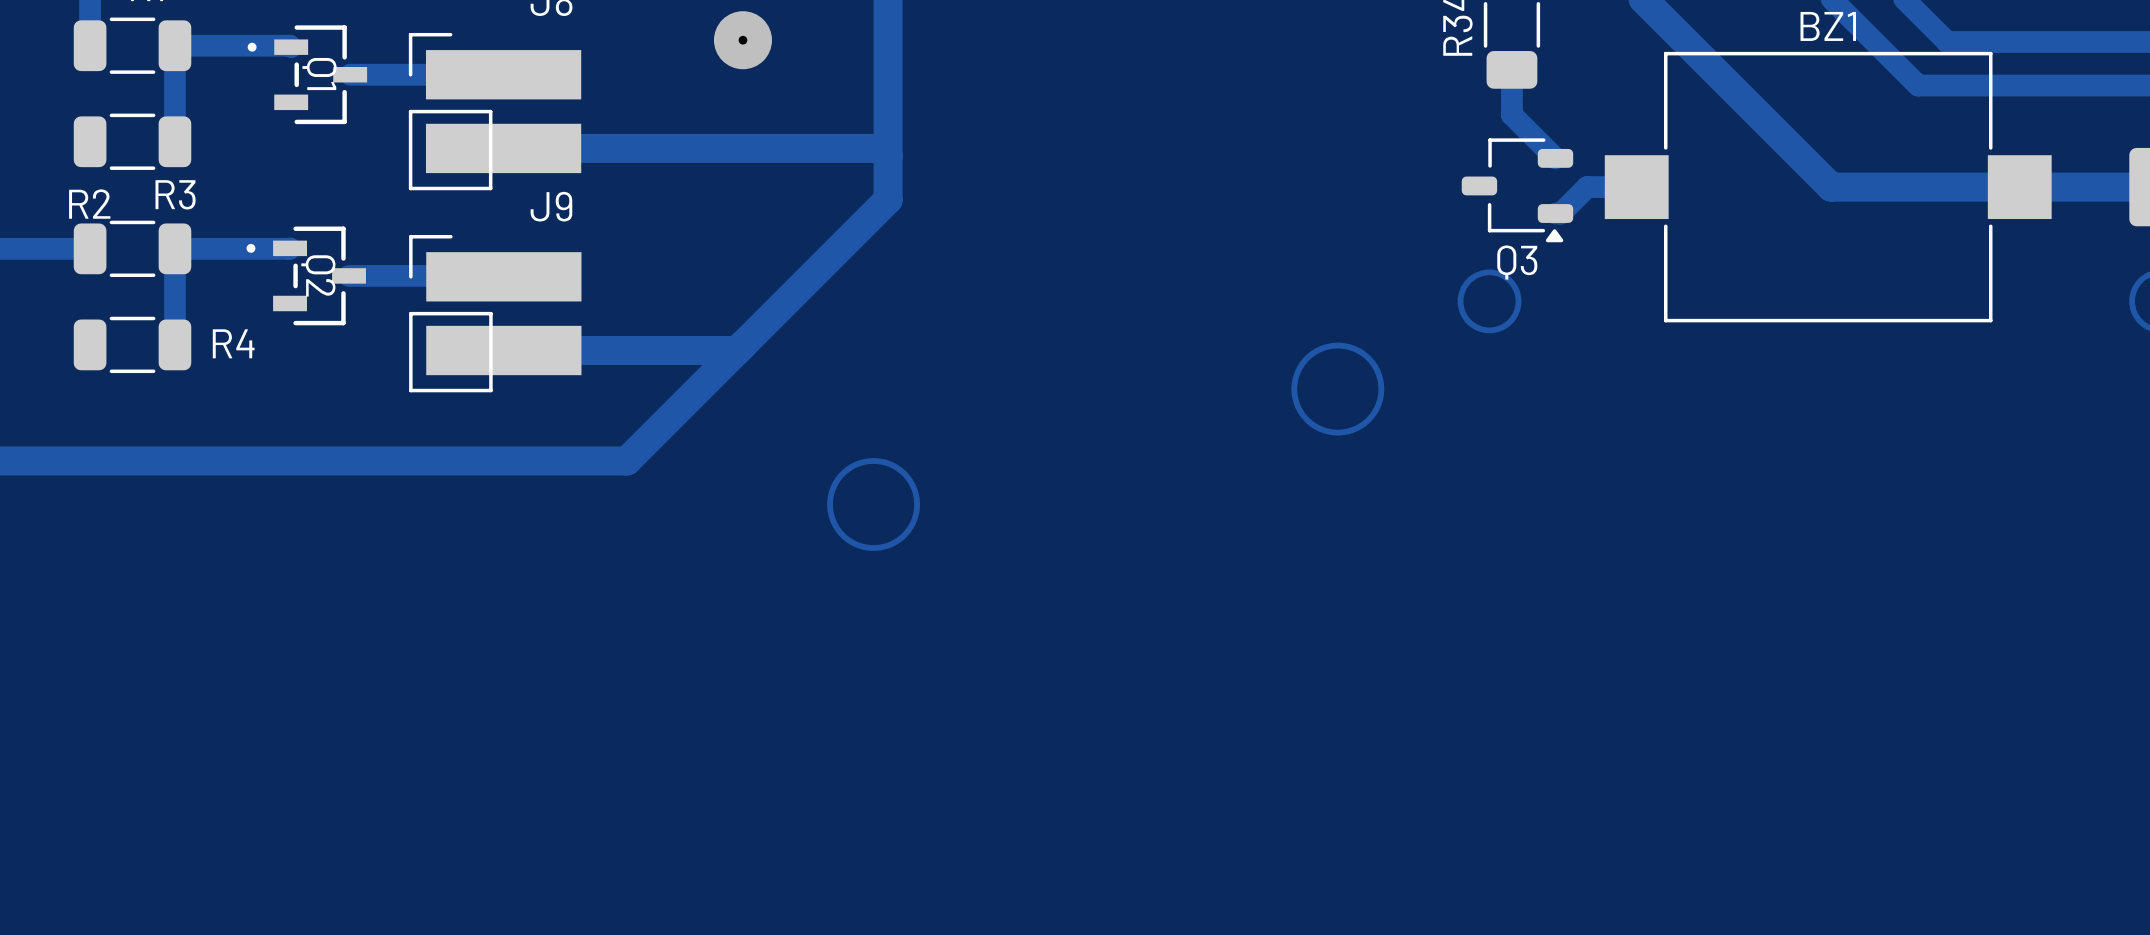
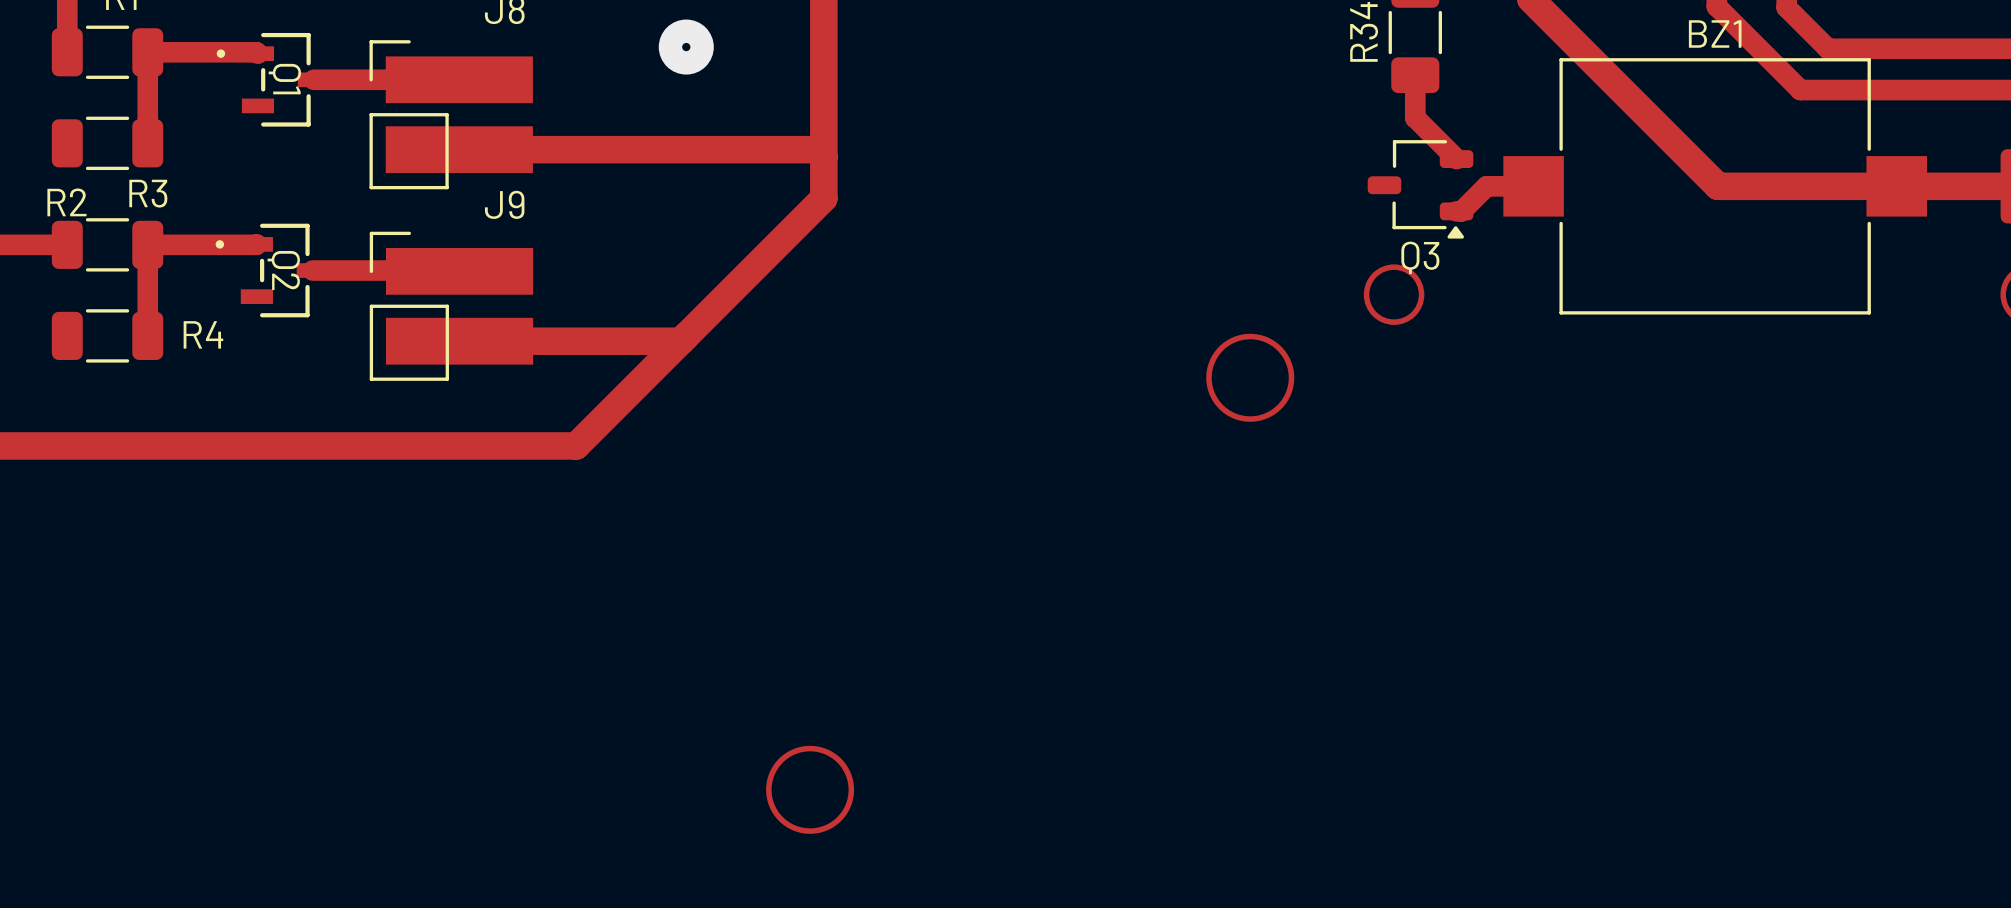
drawing position: (873, 504) -> (810, 789)

